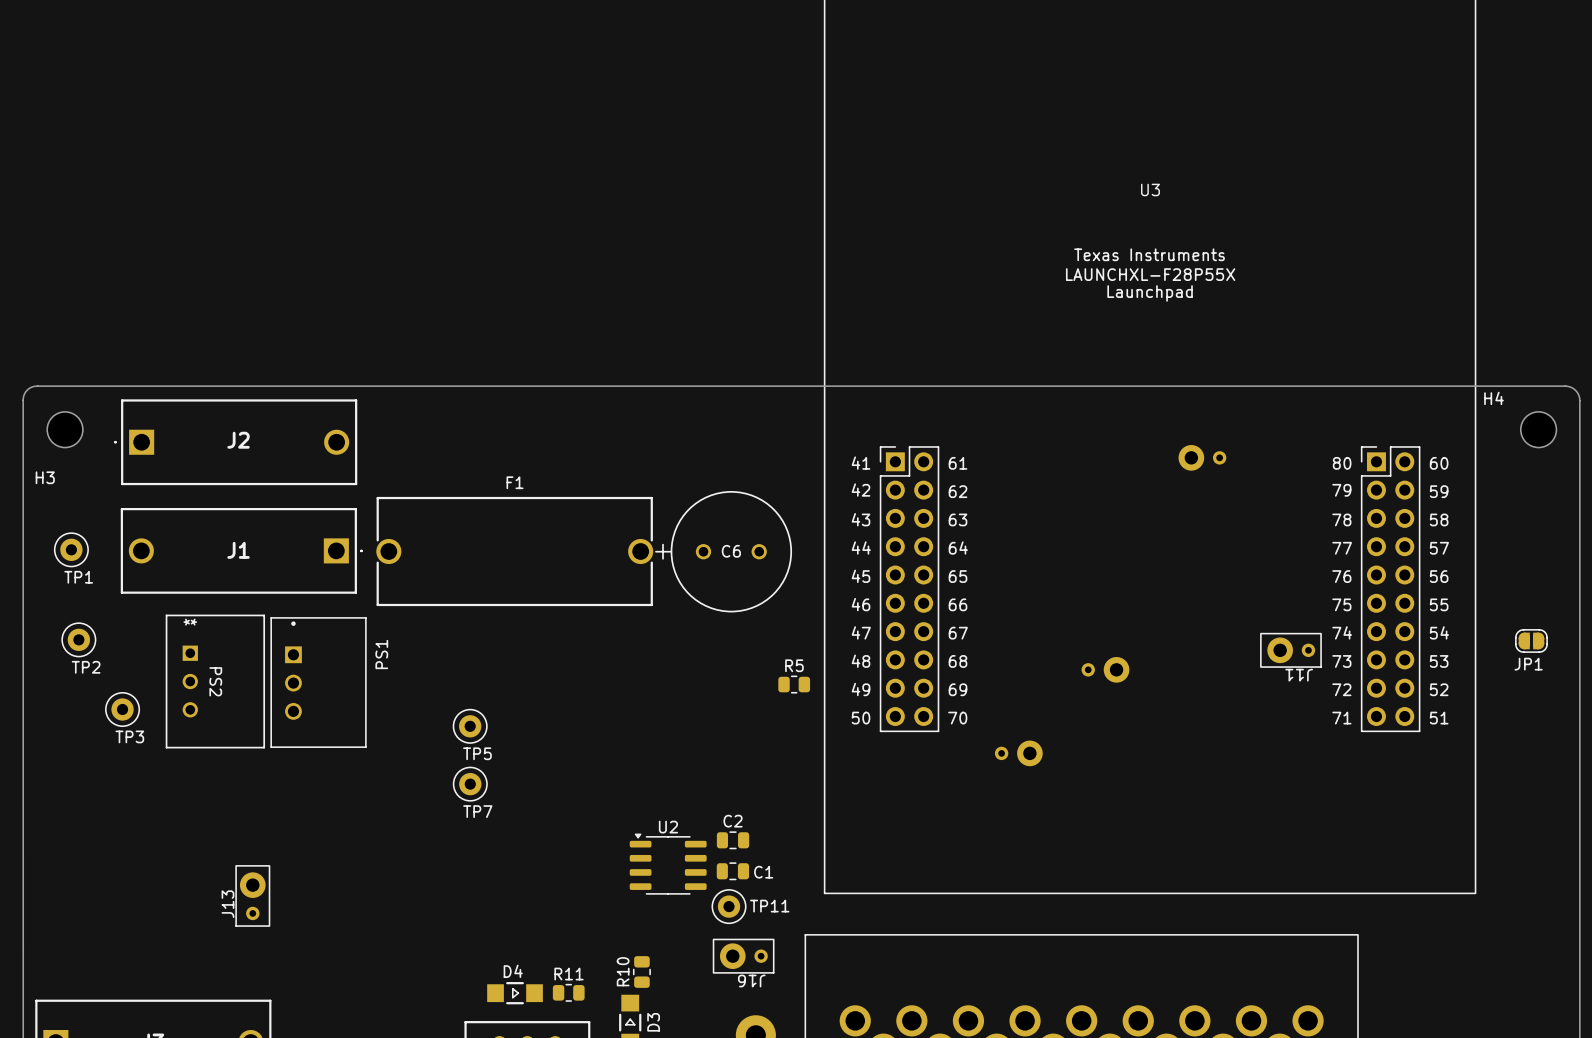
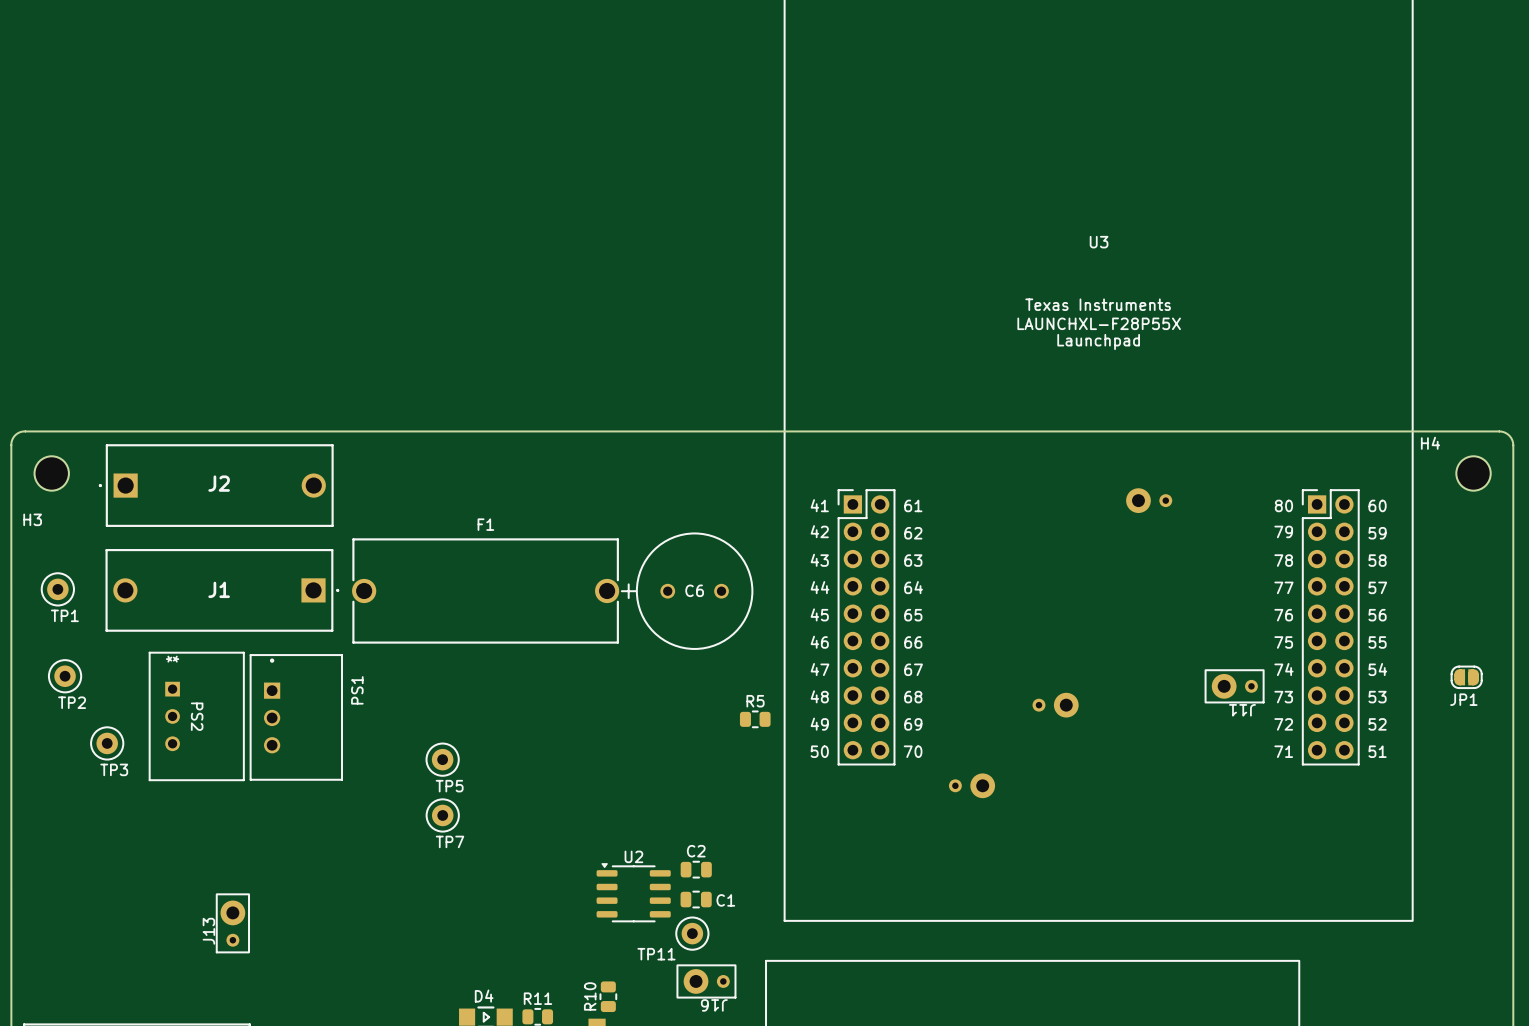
TP11 name position: TP11 (769, 906) -> TP11 (656, 954)

